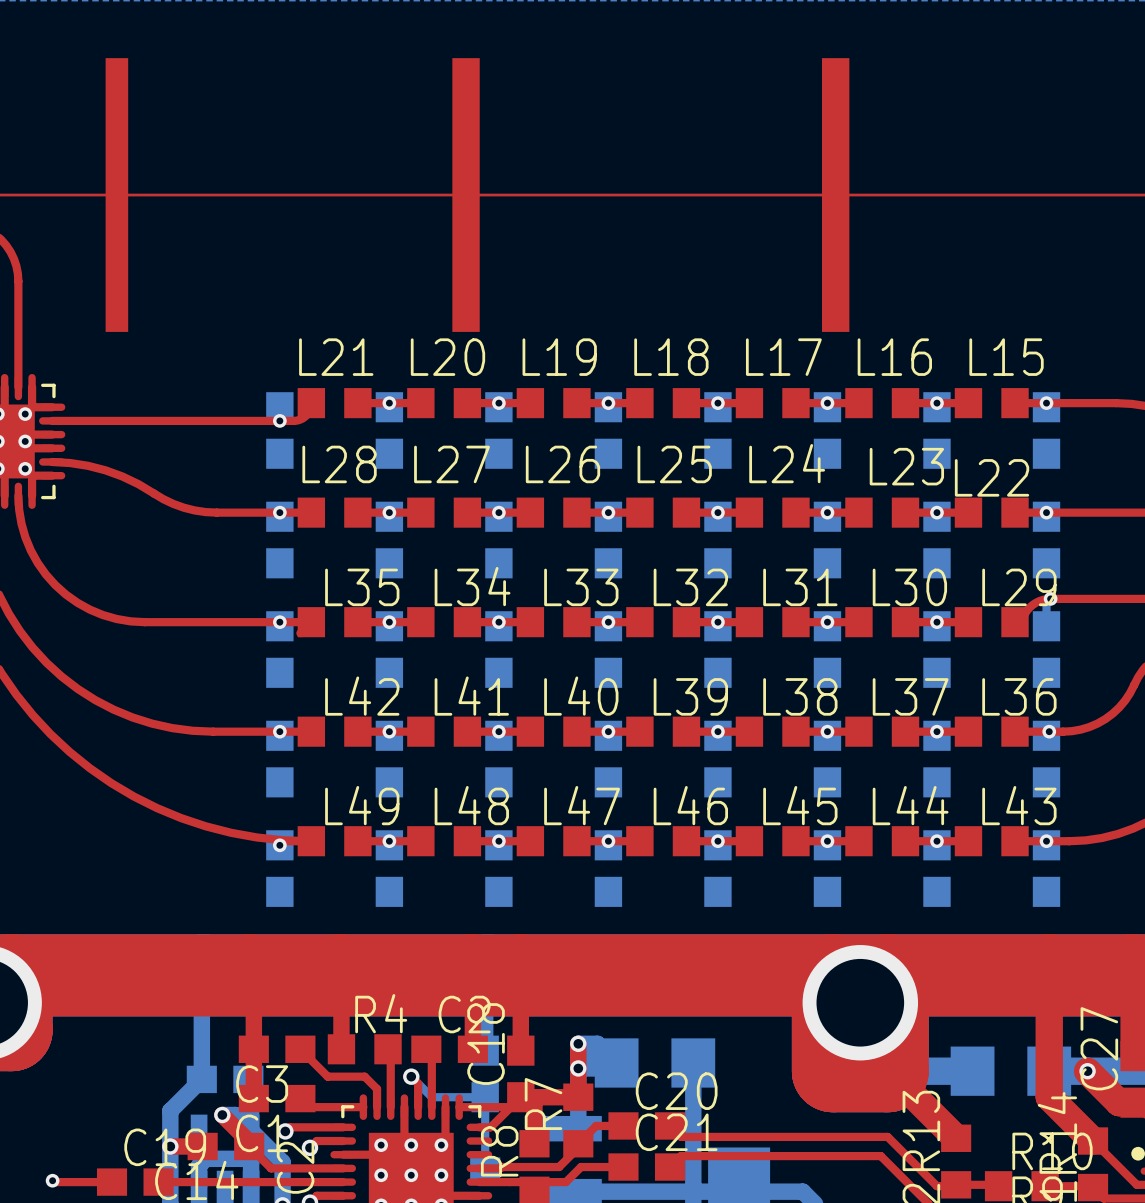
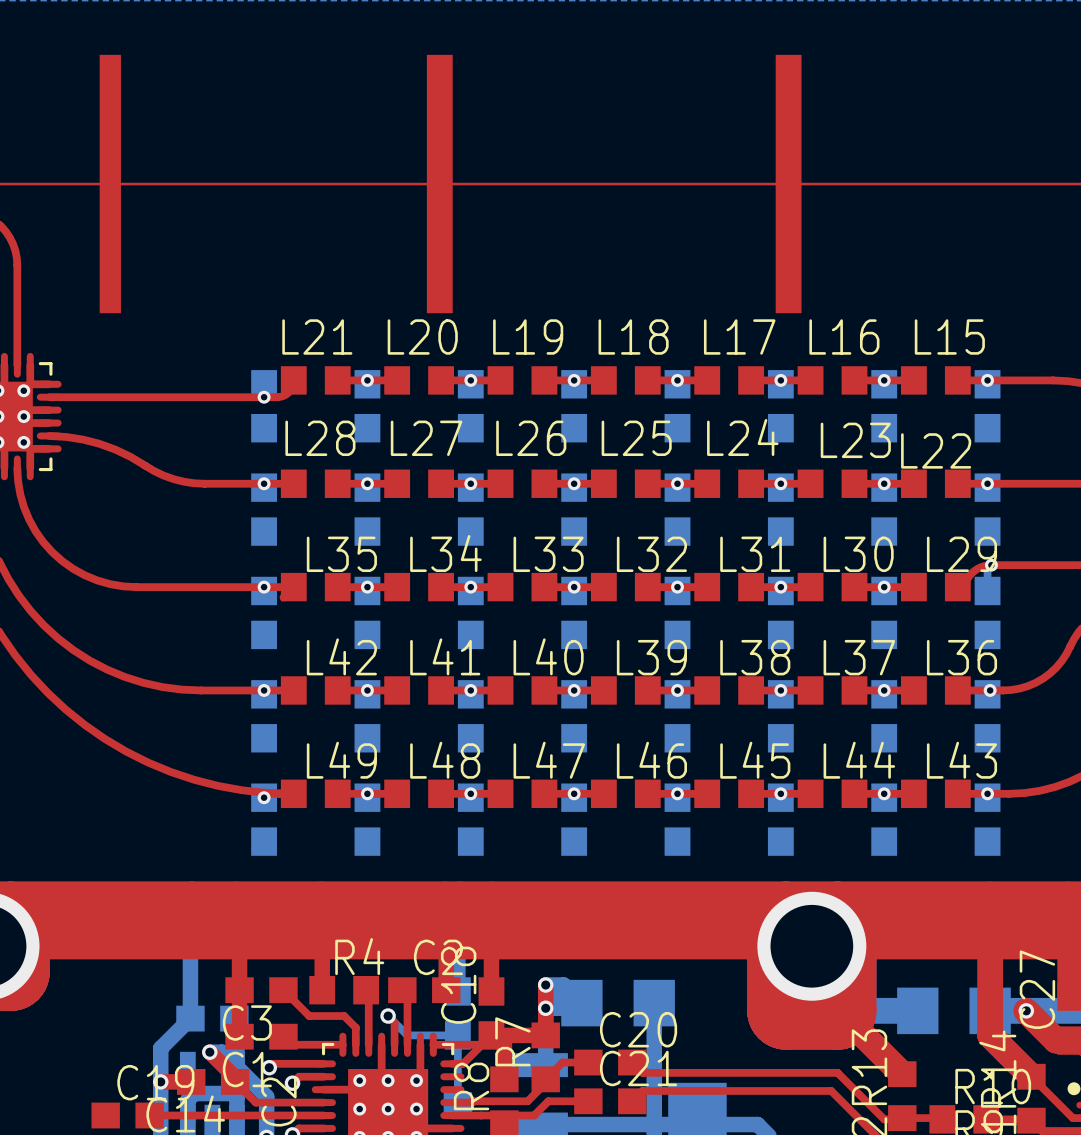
top track: (52, 1180) (112, 1182) -> none
via: (52, 1180) -> none

